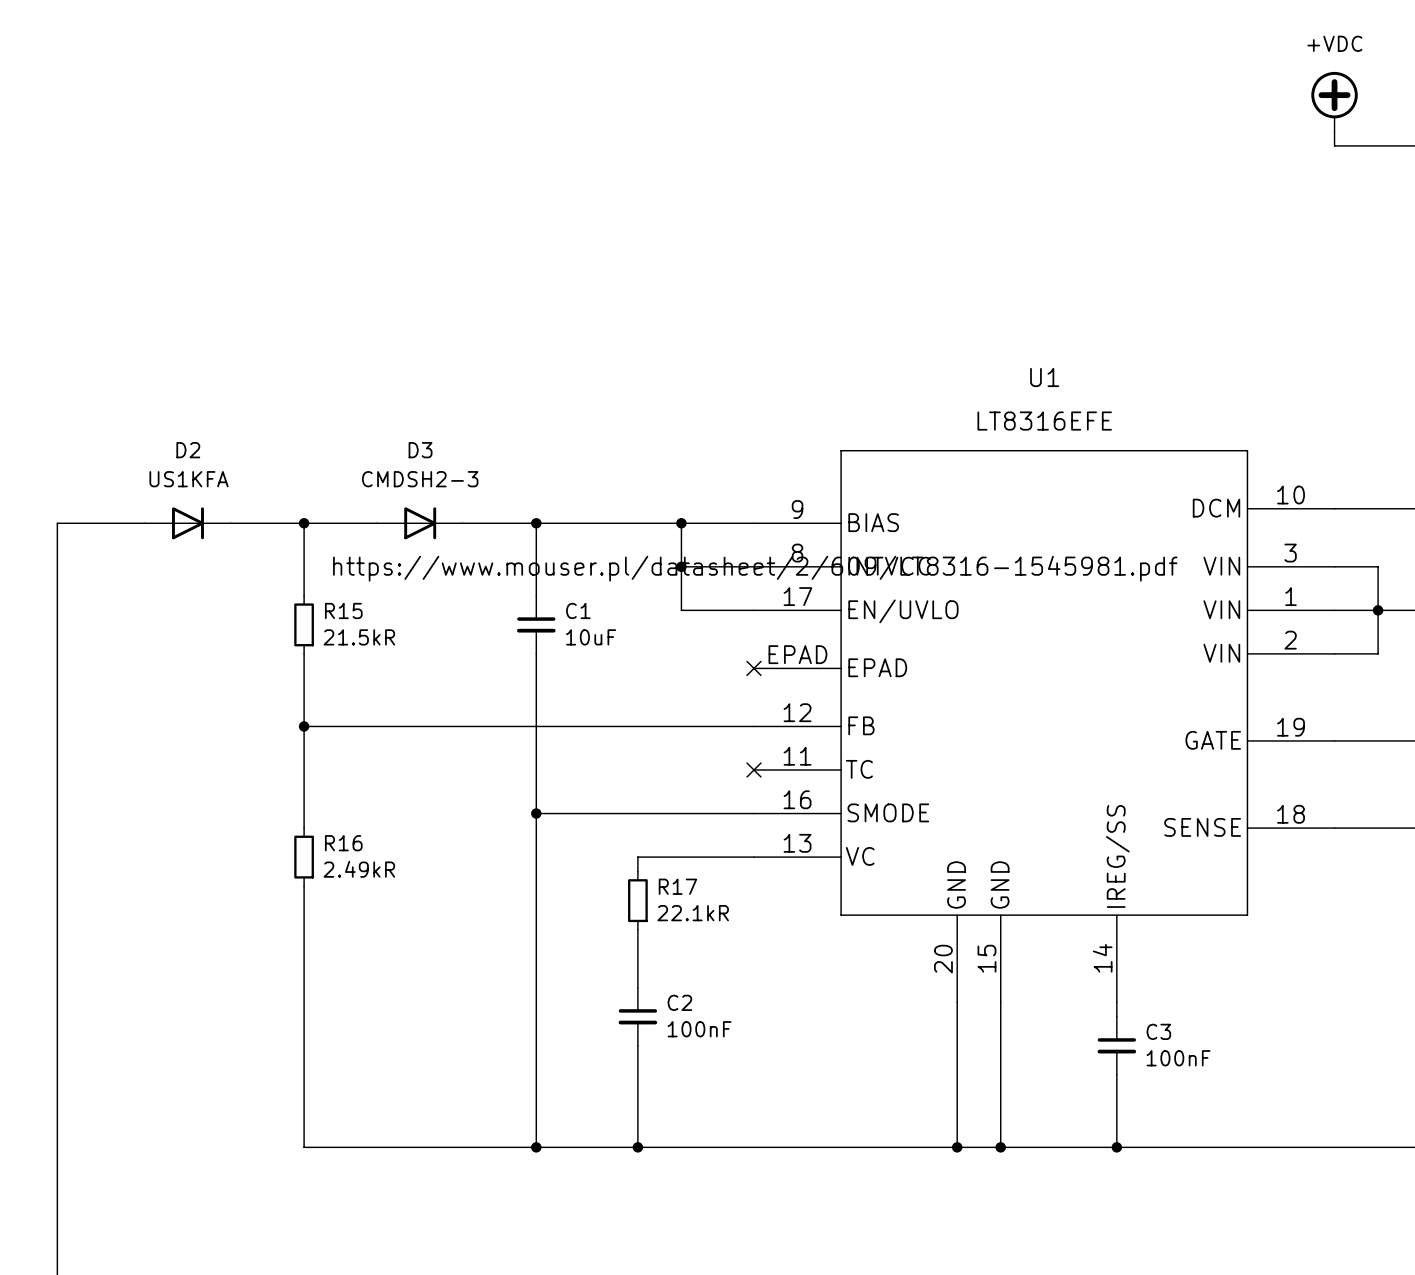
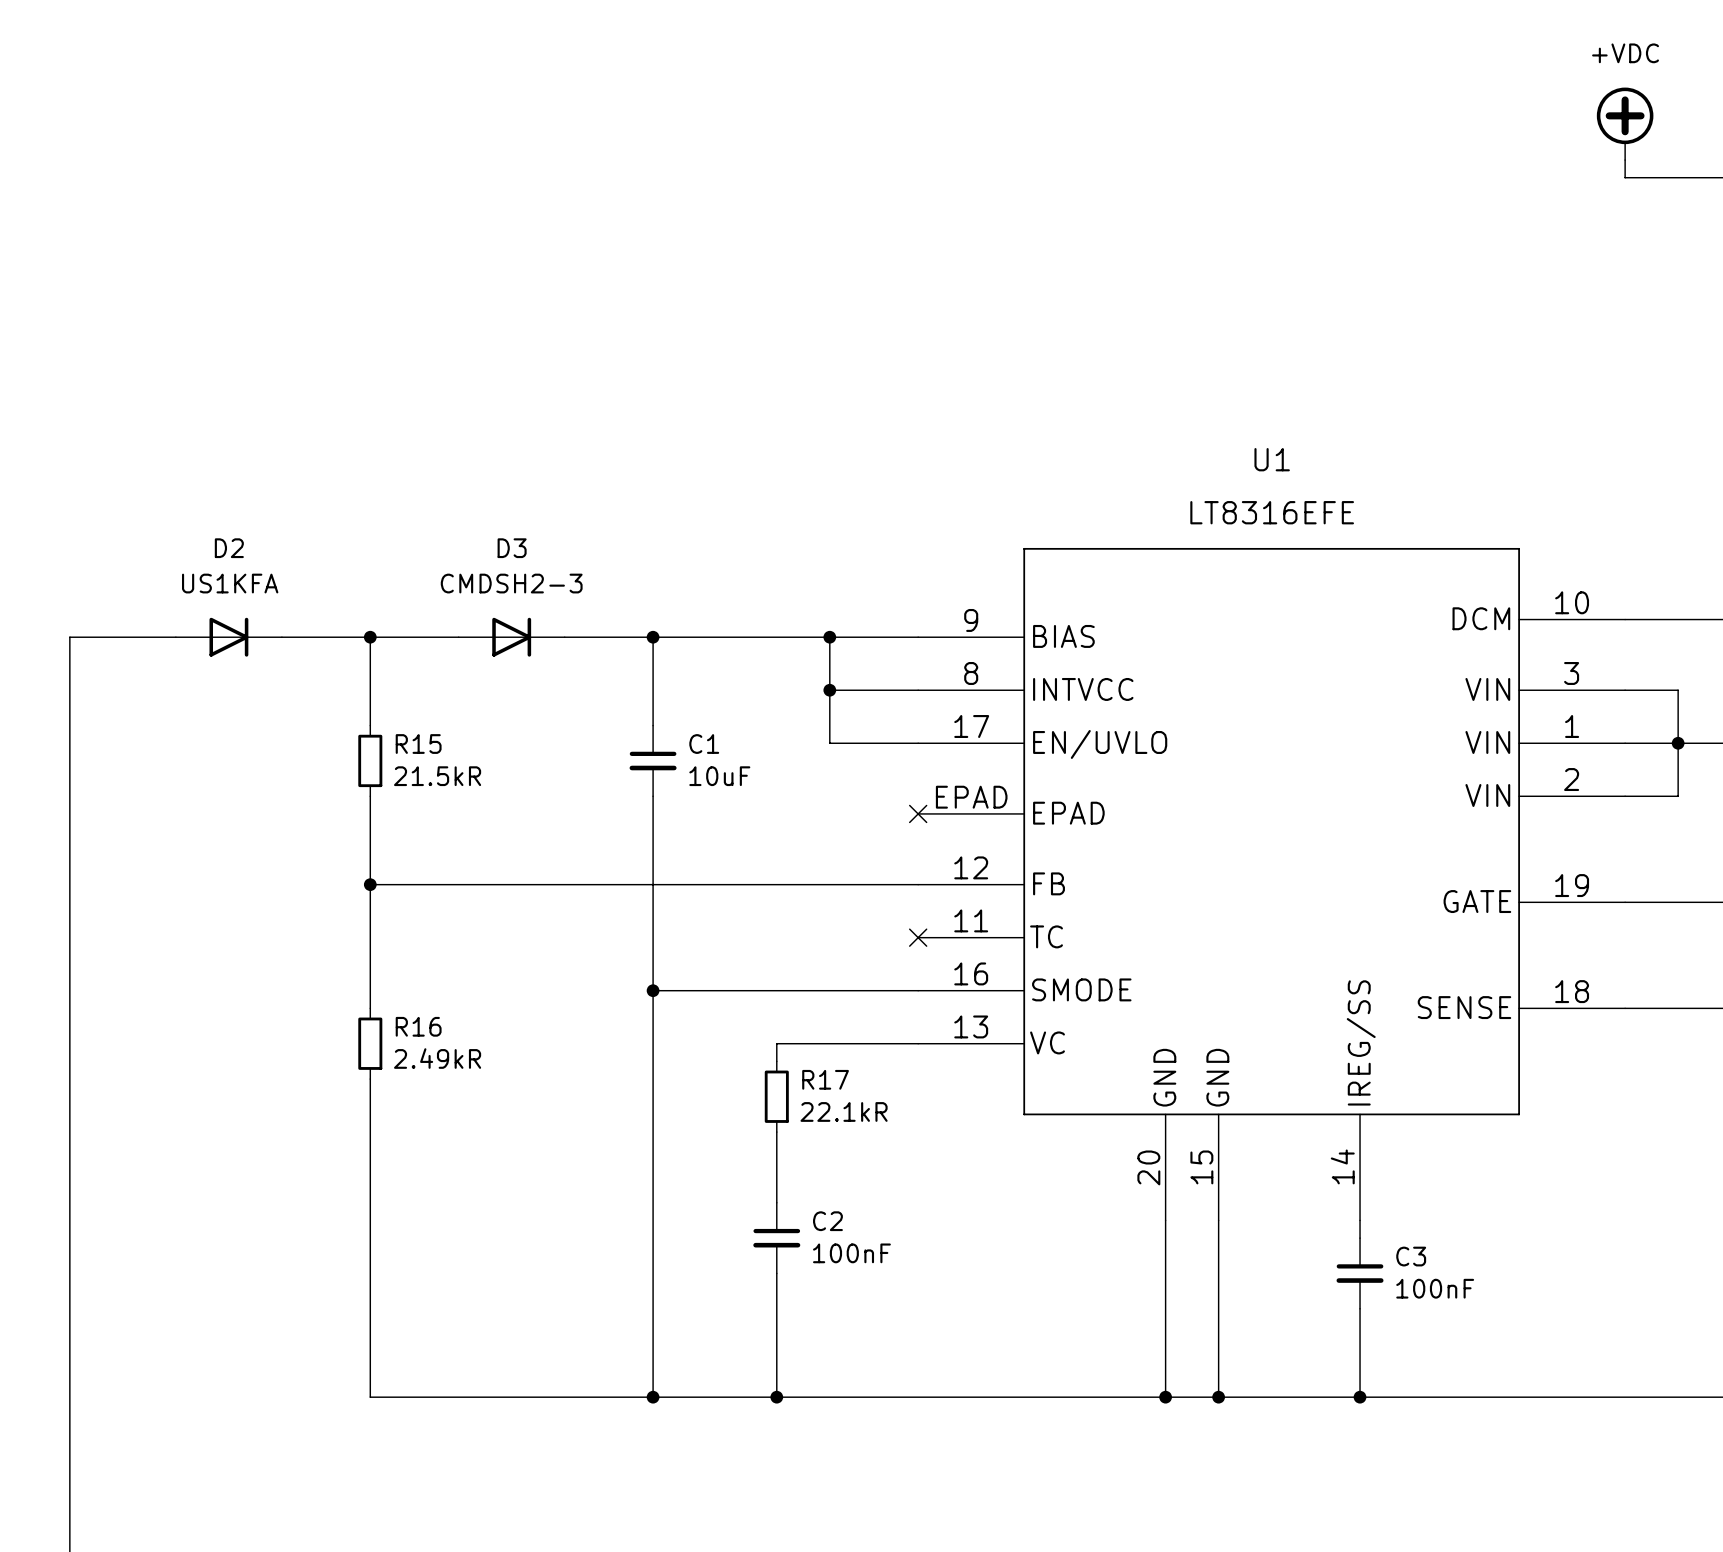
U1 text: https://www.mouser.pl/datasheet/2/609/LT8316-1545981.pdf (755, 568) -> none

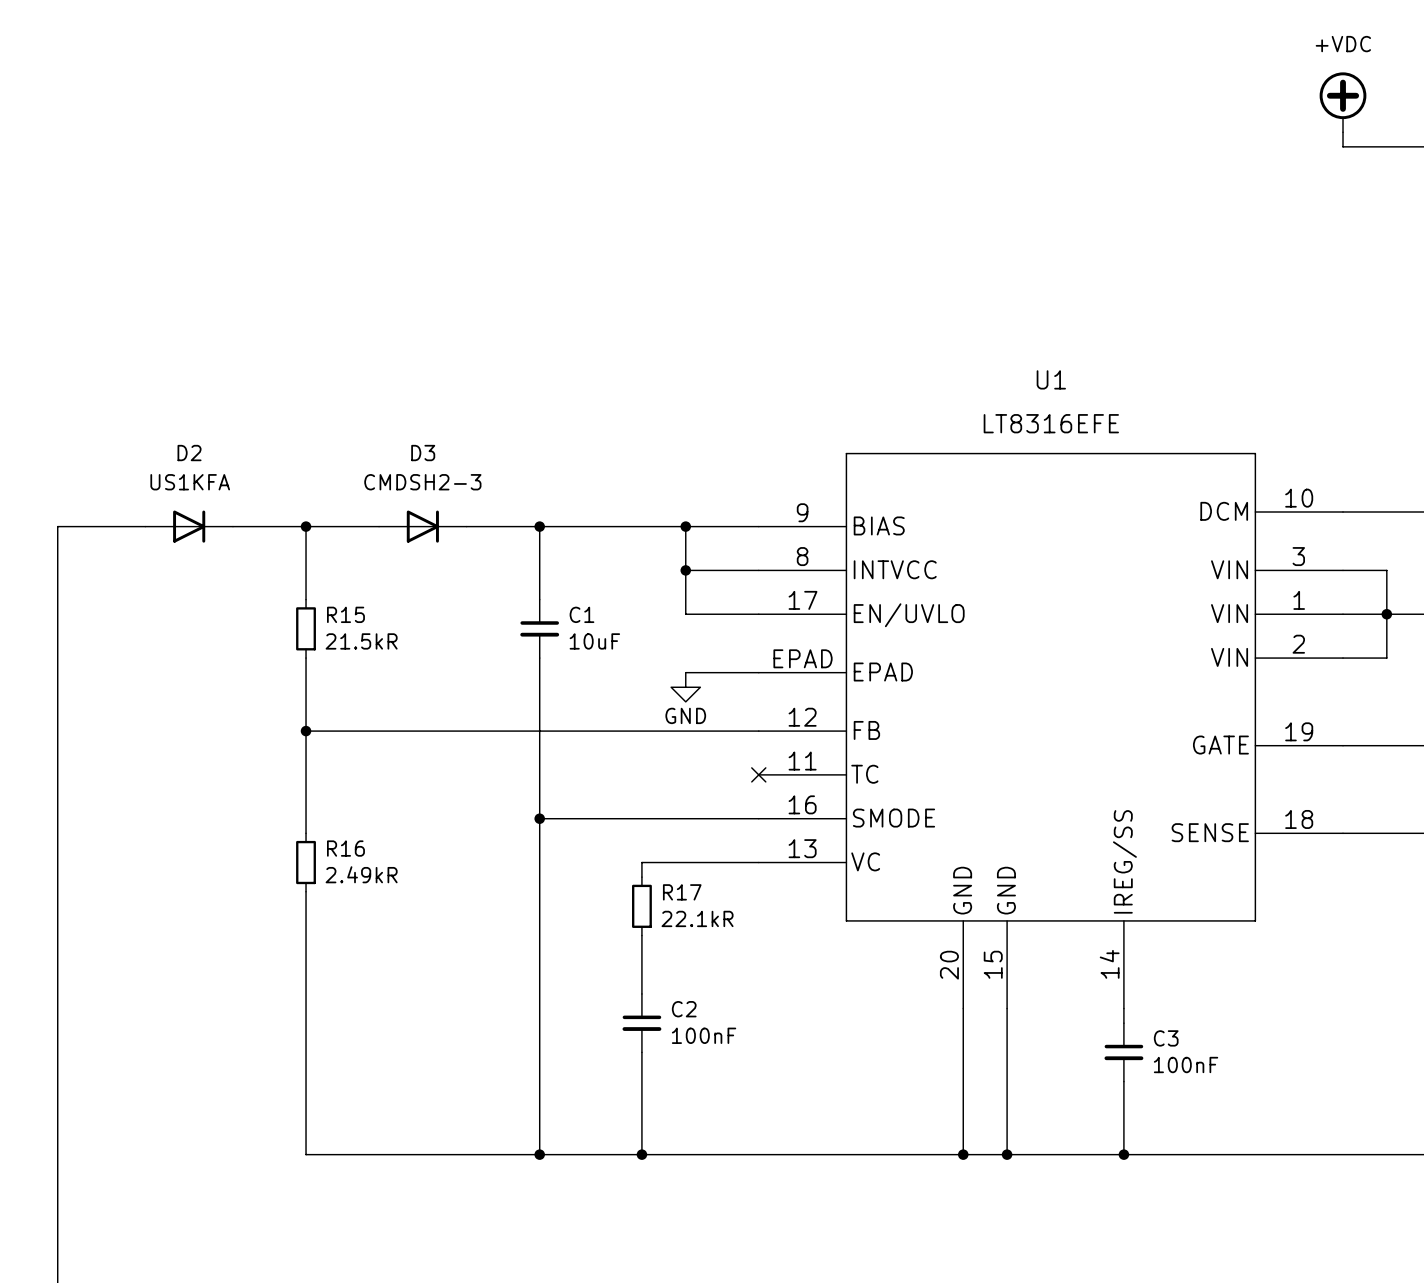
wire: none -> (685, 672) (758, 672)
no-connect mark: (918, 813) -> none
power symbol: none -> GND (685, 687)

